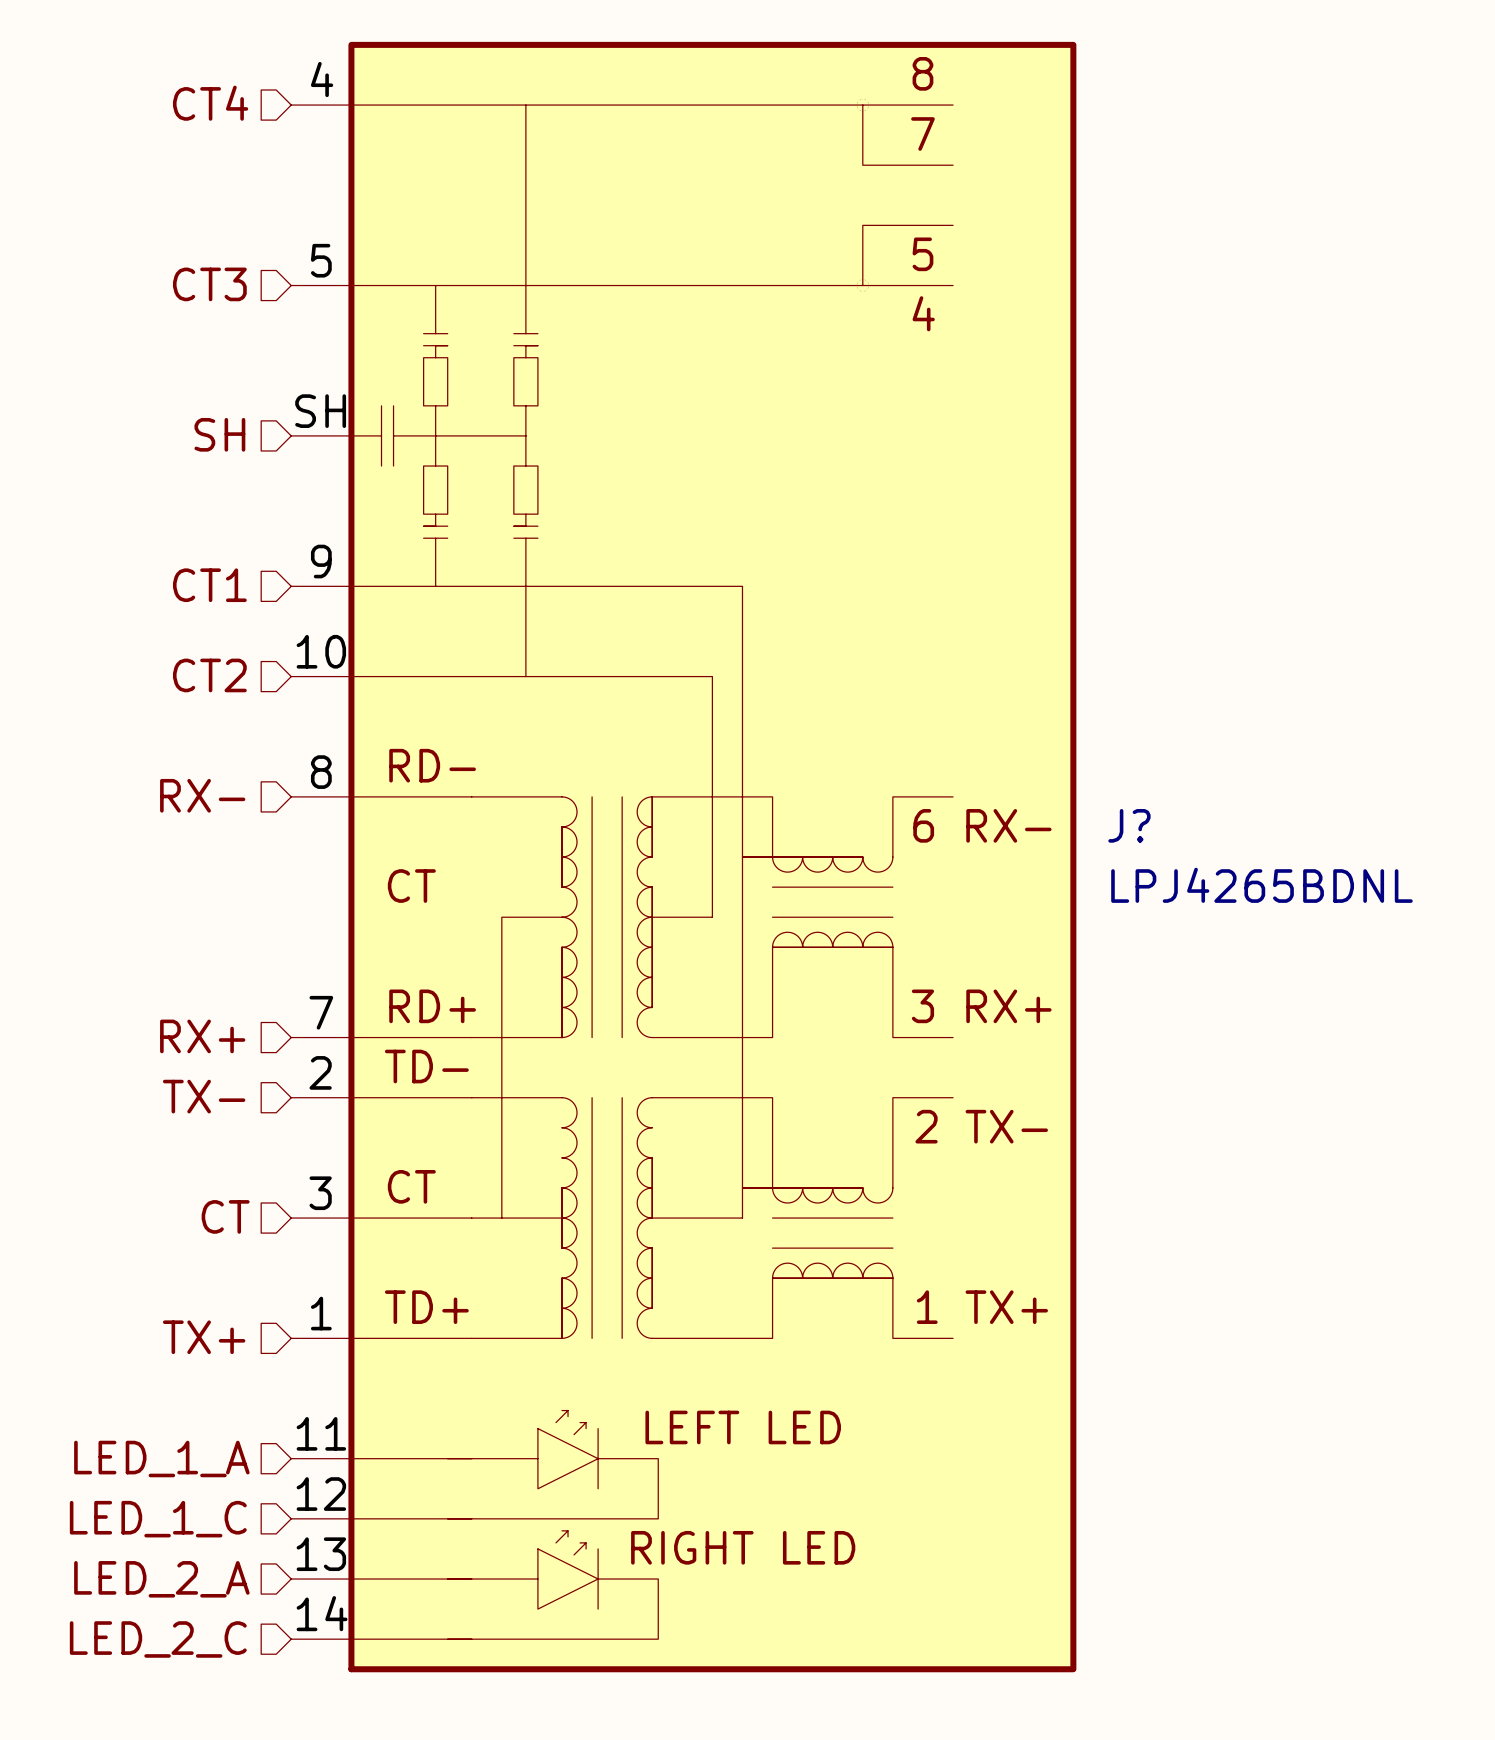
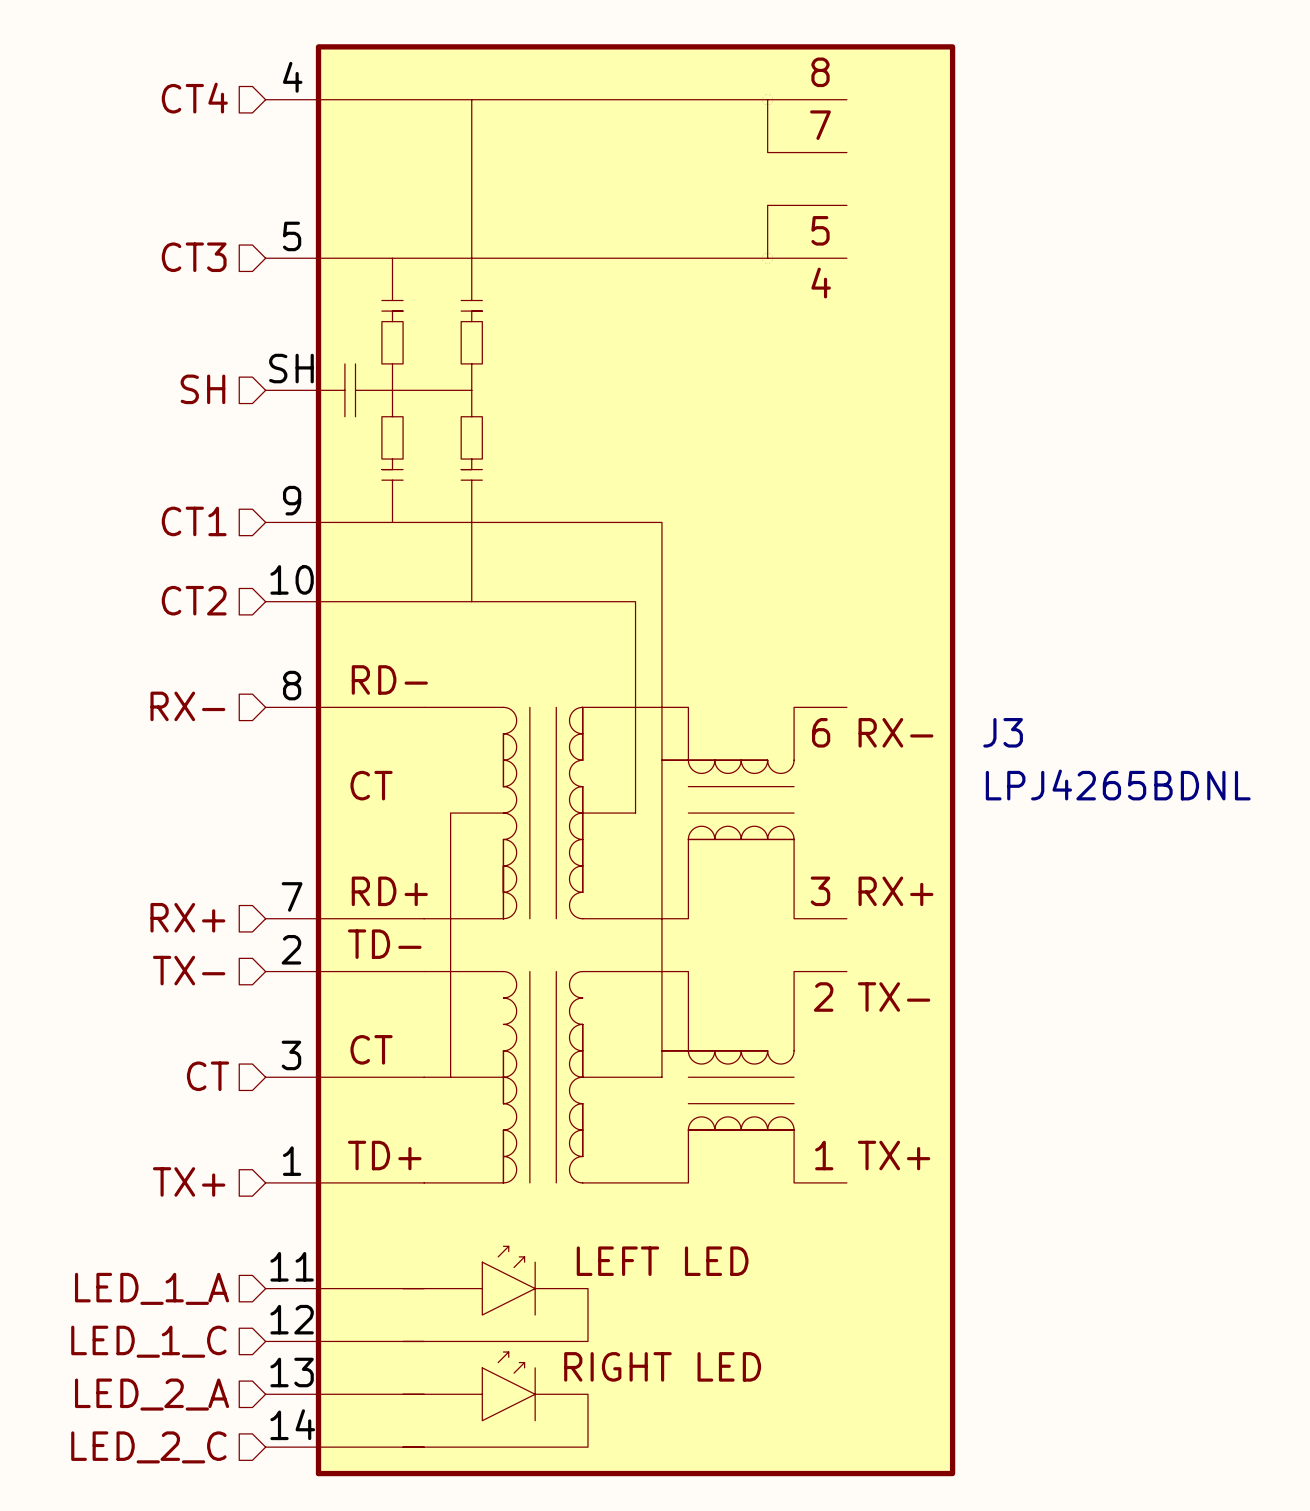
J? name: J? (1129, 825) -> J3 (1003, 732)

